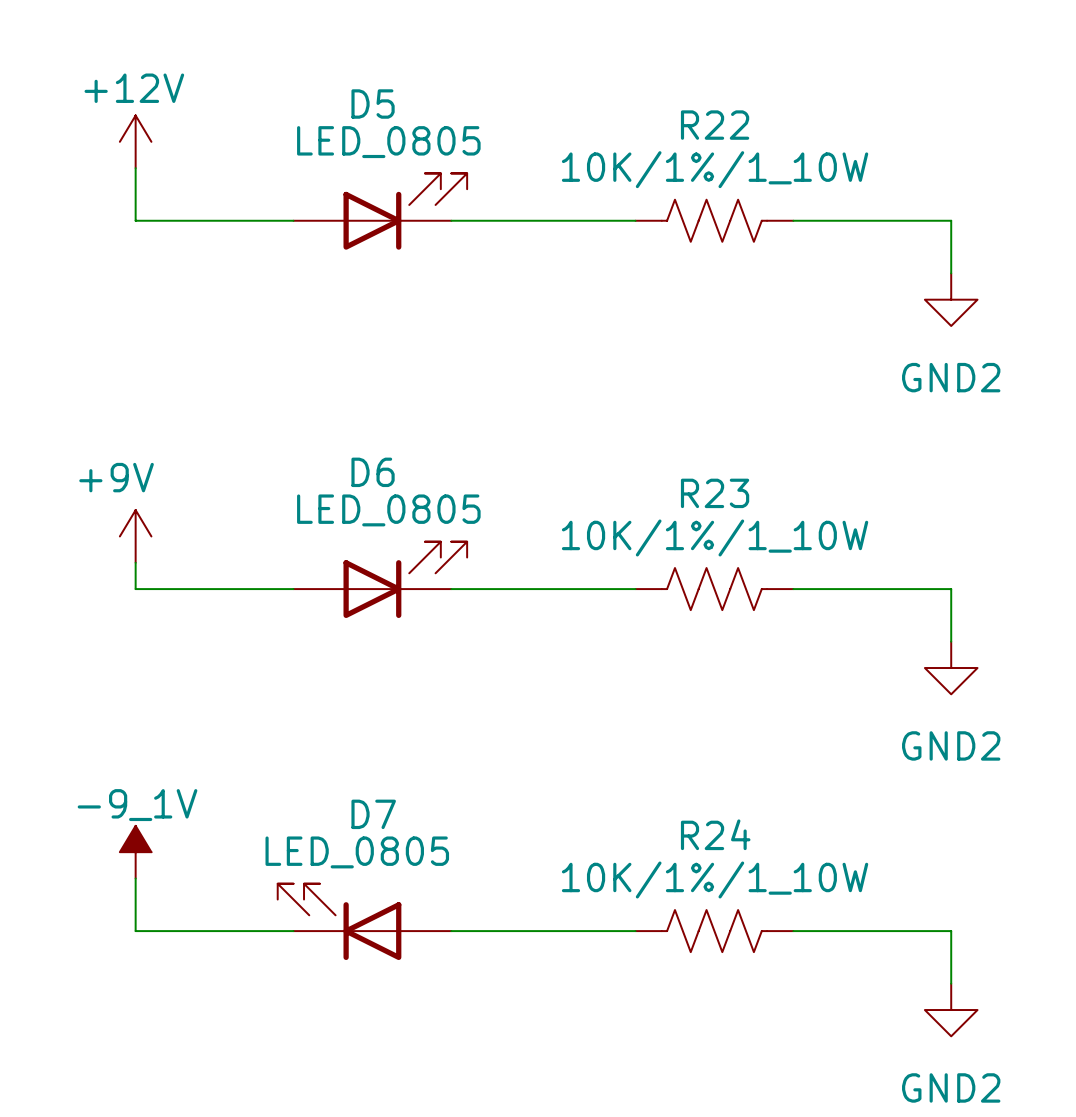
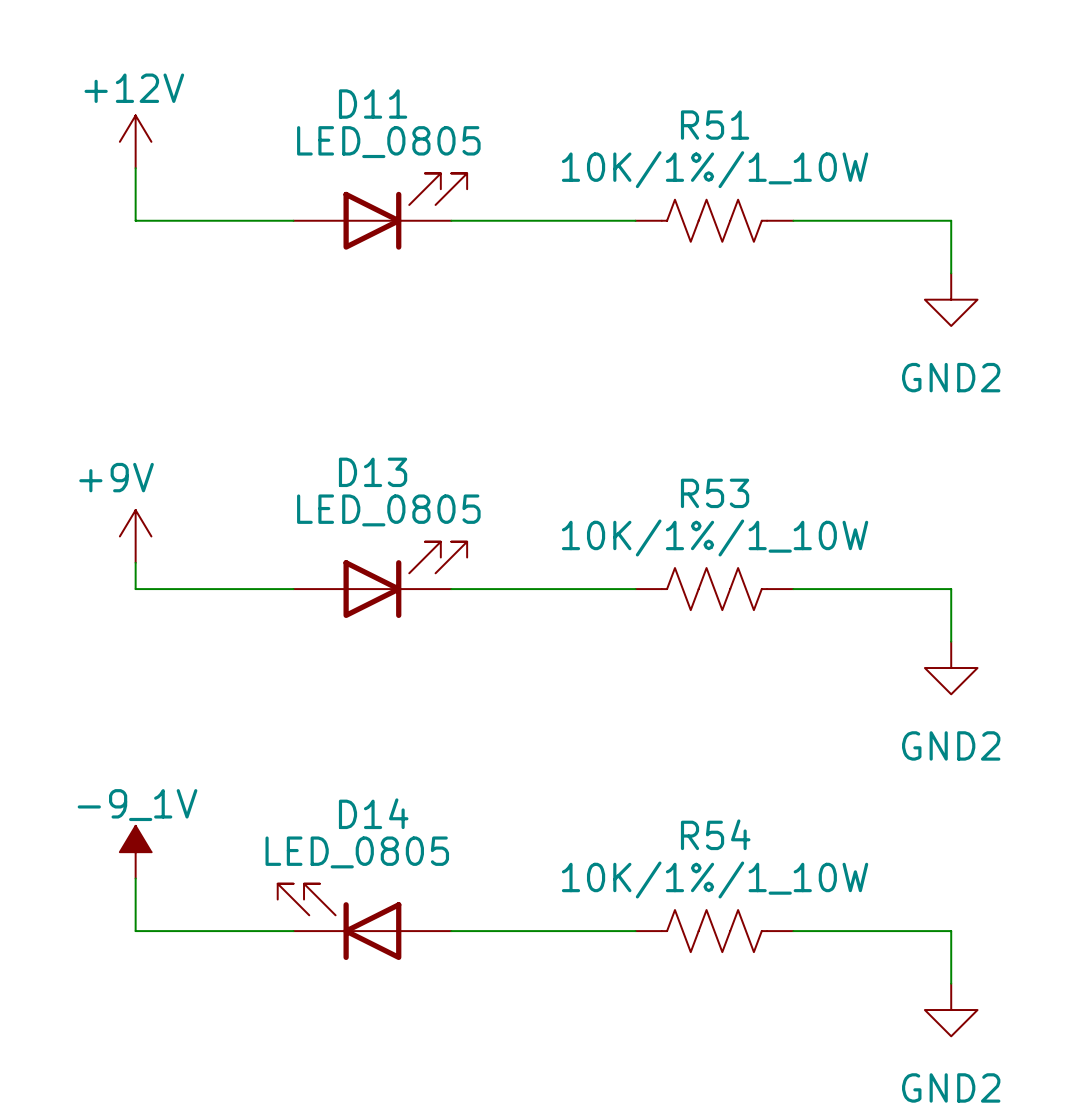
D5 name: D5 (373, 104) -> D11 (373, 104)
R22 name: R22 (715, 125) -> R51 (715, 125)
D6 name: D6 (373, 472) -> D13 (373, 472)
R23 name: R23 (715, 493) -> R53 (715, 493)
D7 name: D7 (373, 814) -> D14 (373, 813)
R24 name: R24 (715, 834) -> R54 (715, 834)

